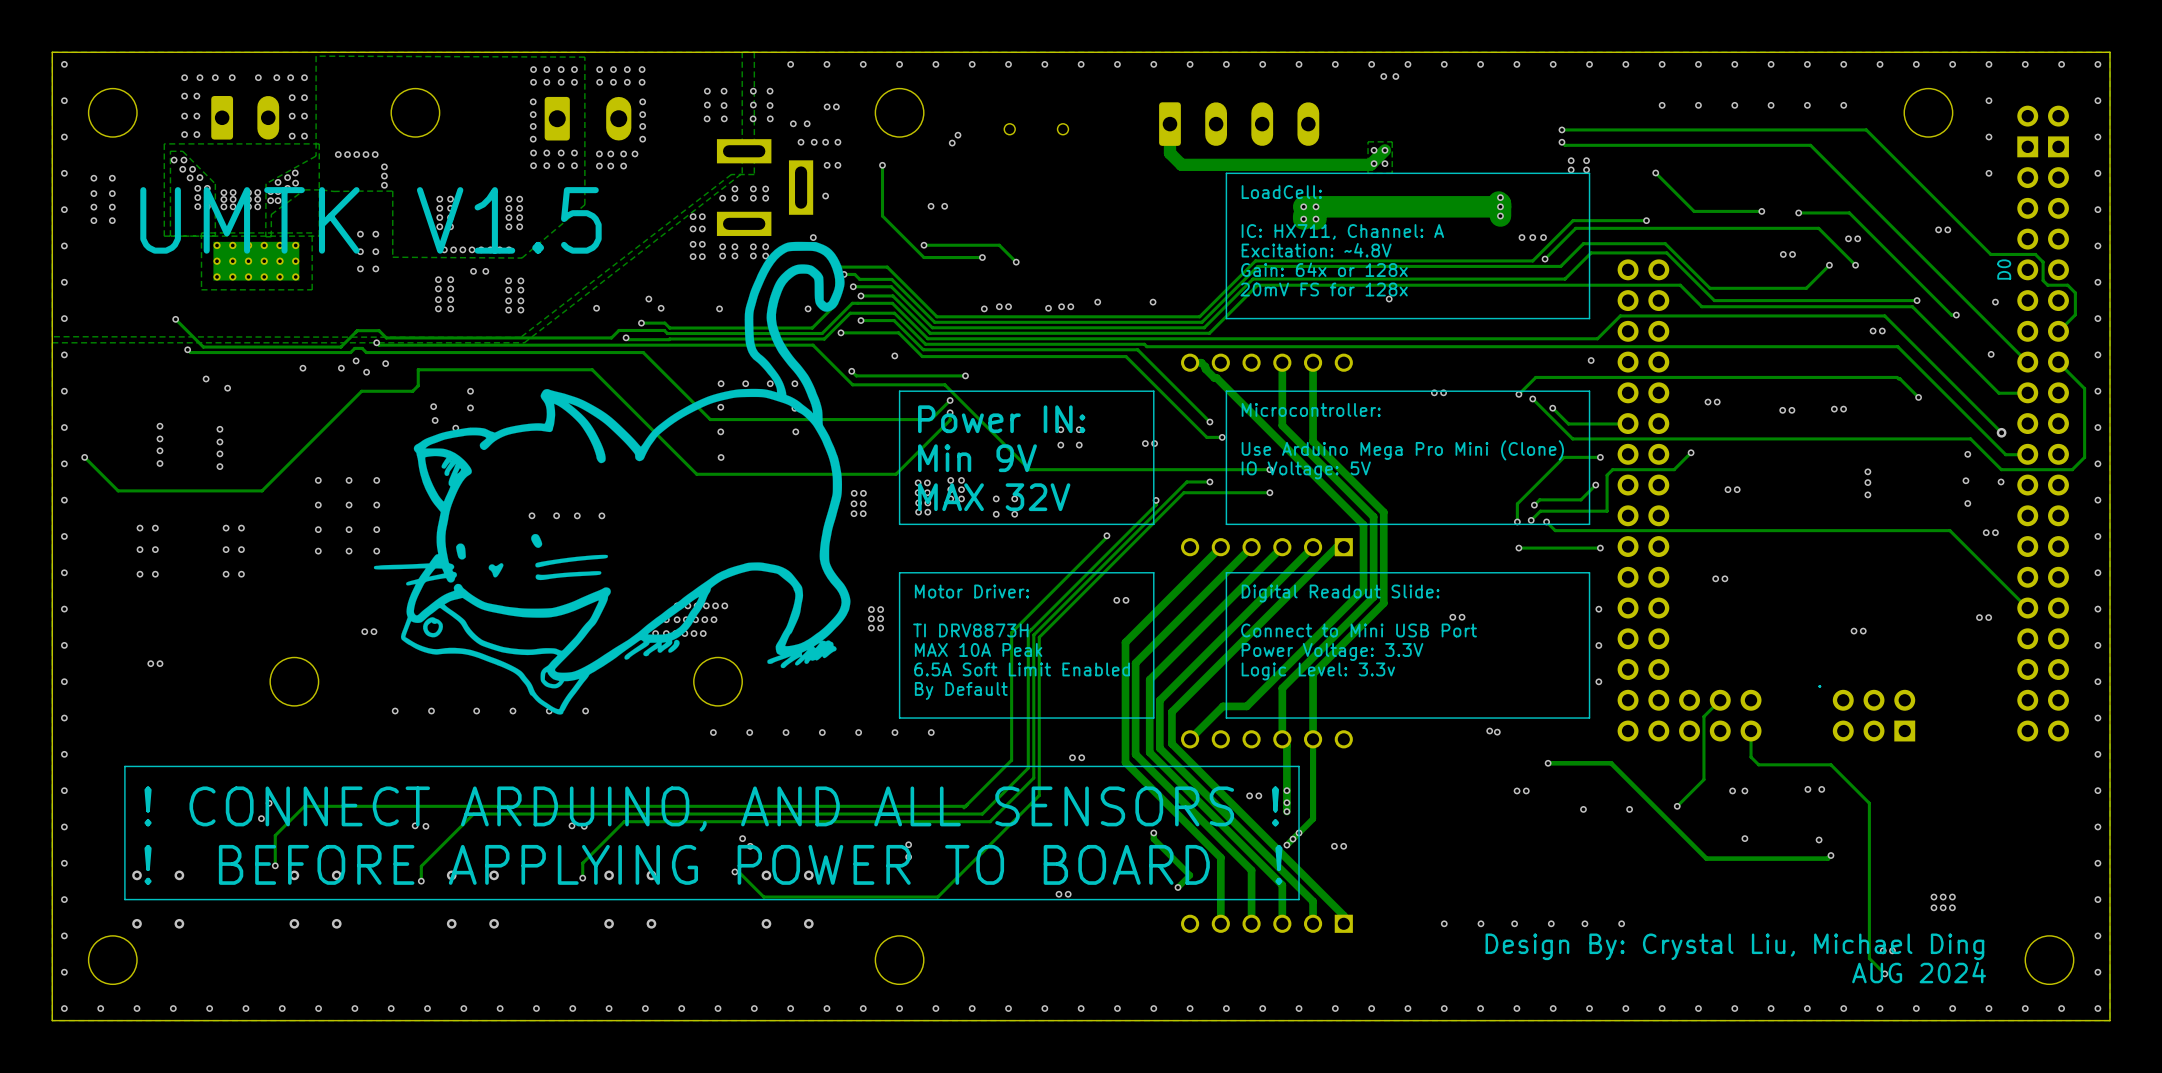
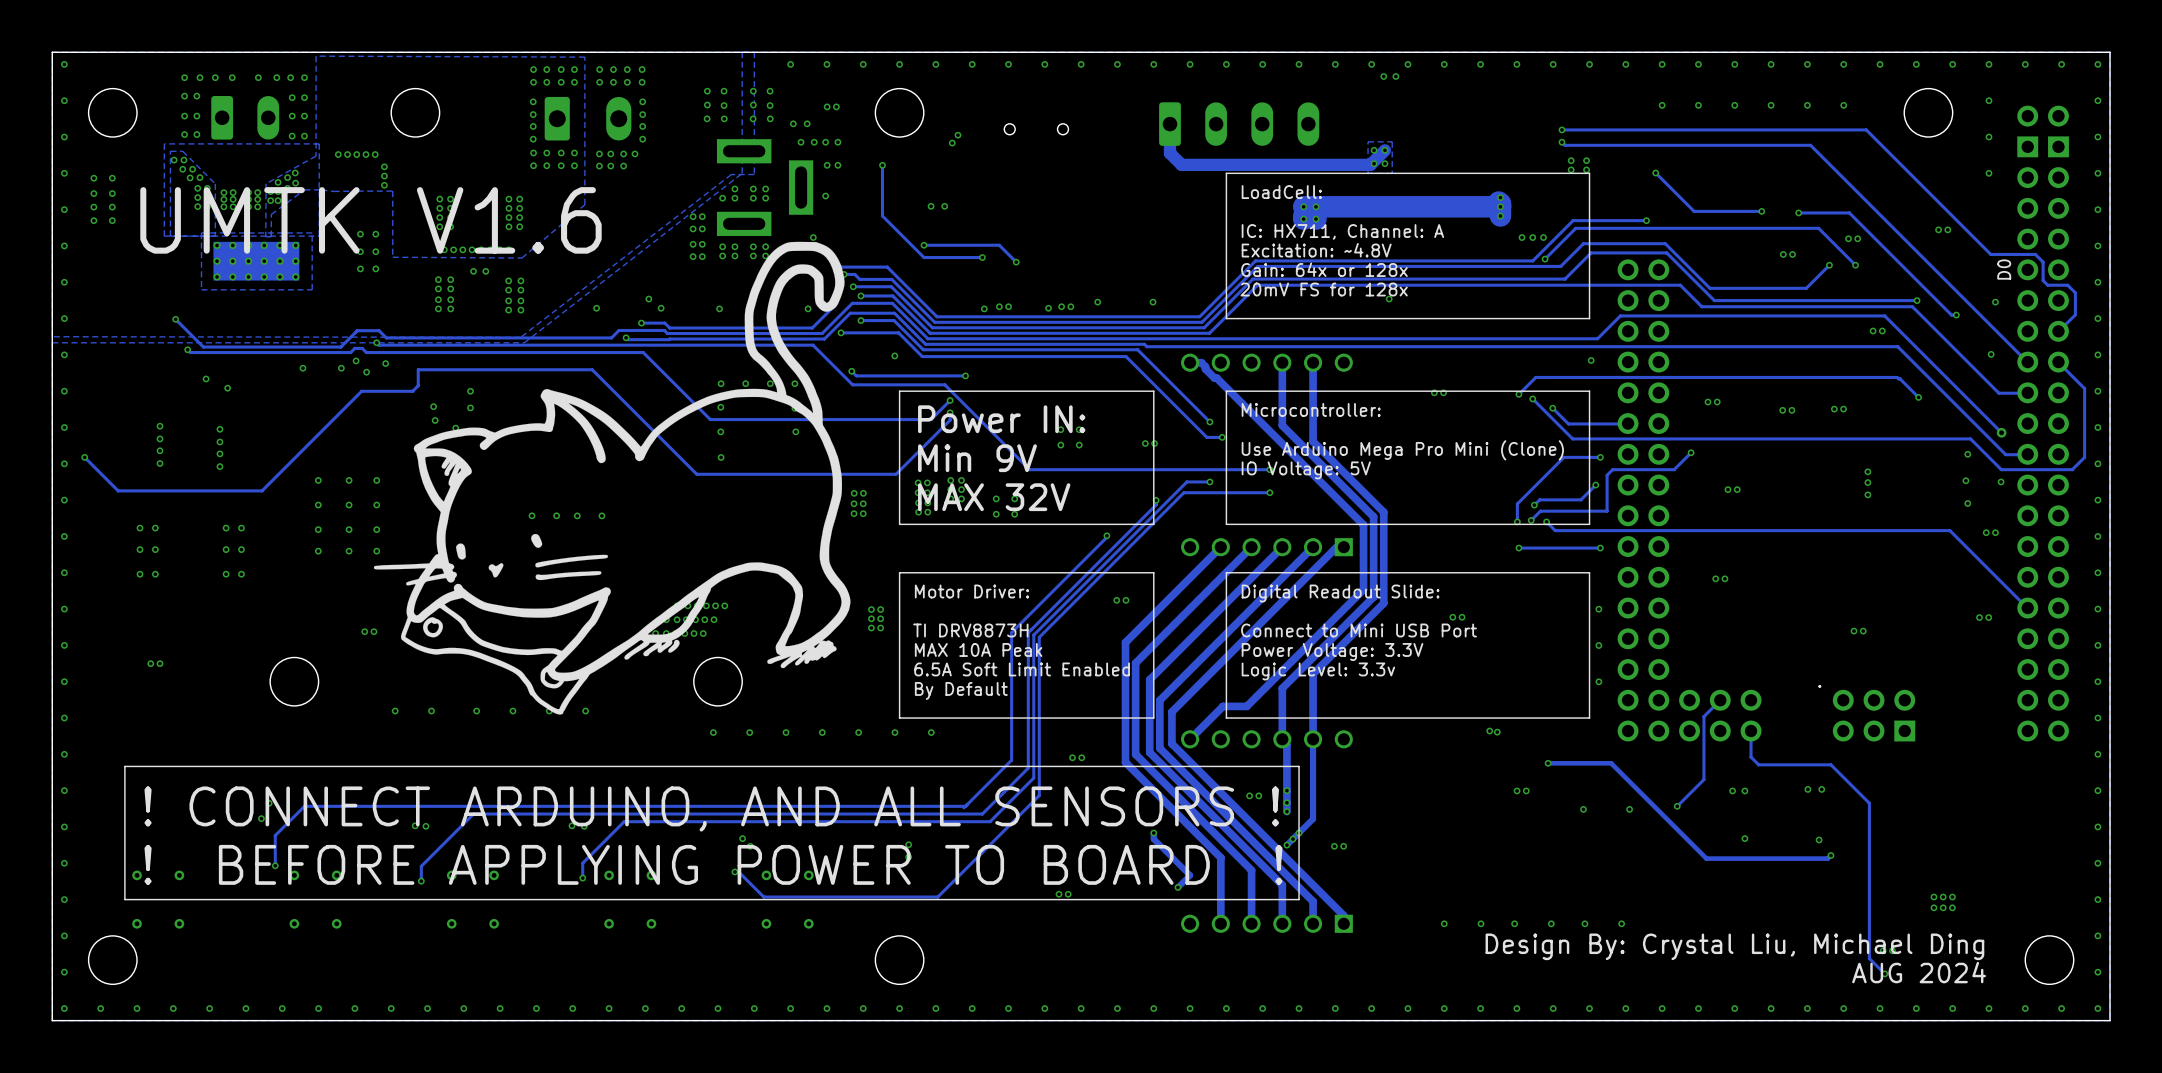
text: UMTK V1.5 (370, 220) -> UMTK V1.6 (370, 220)

